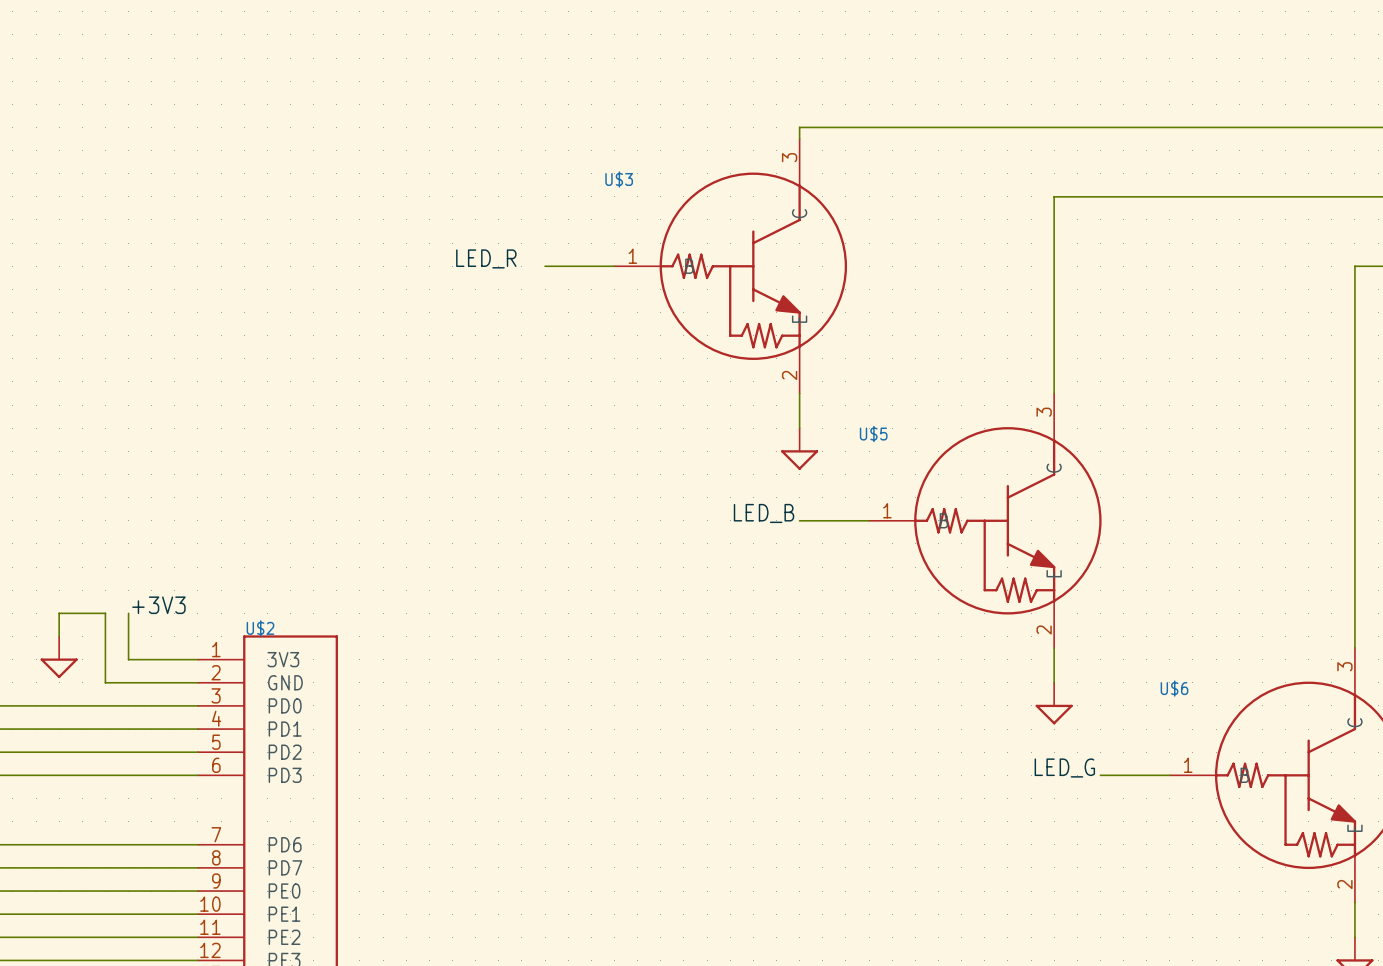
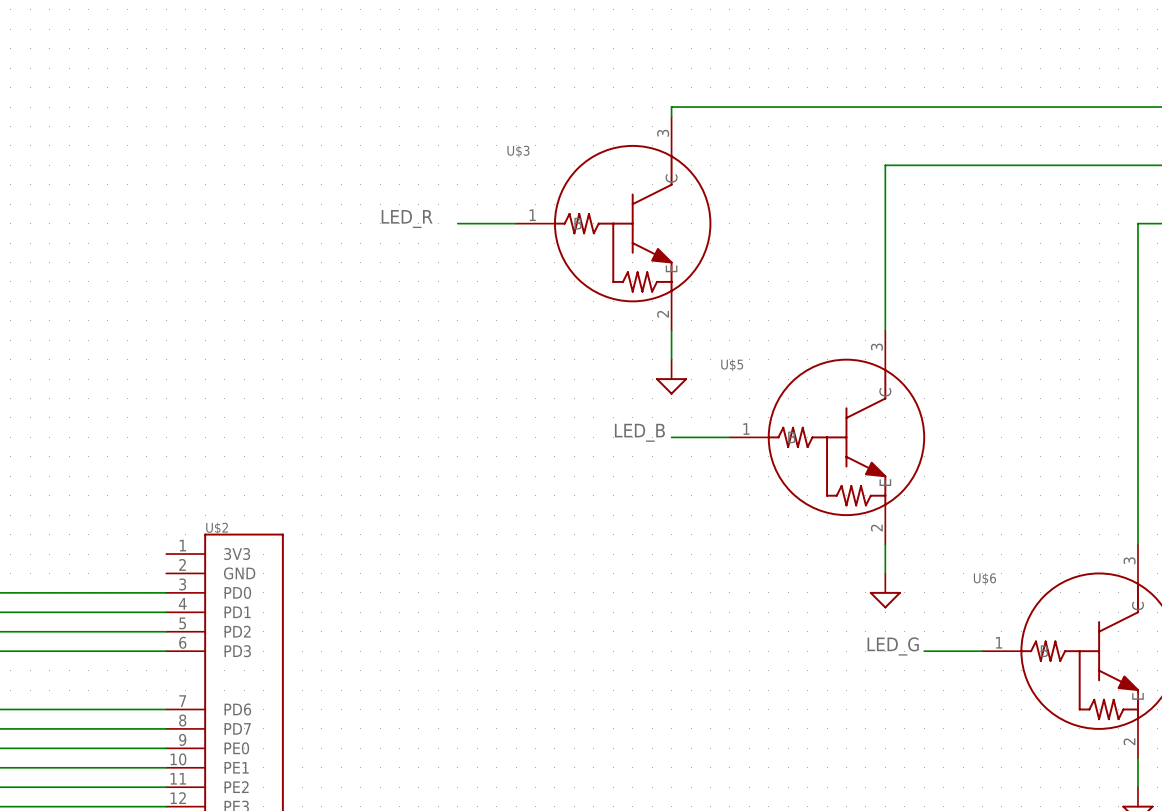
label: +3V3 (158, 605) -> none
wire: (128, 613) (128, 659) (197, 659) -> none
wire: (59, 636) (59, 613) (105, 613) (105, 682) (197, 682) -> none
power symbol: (59, 657) -> none

